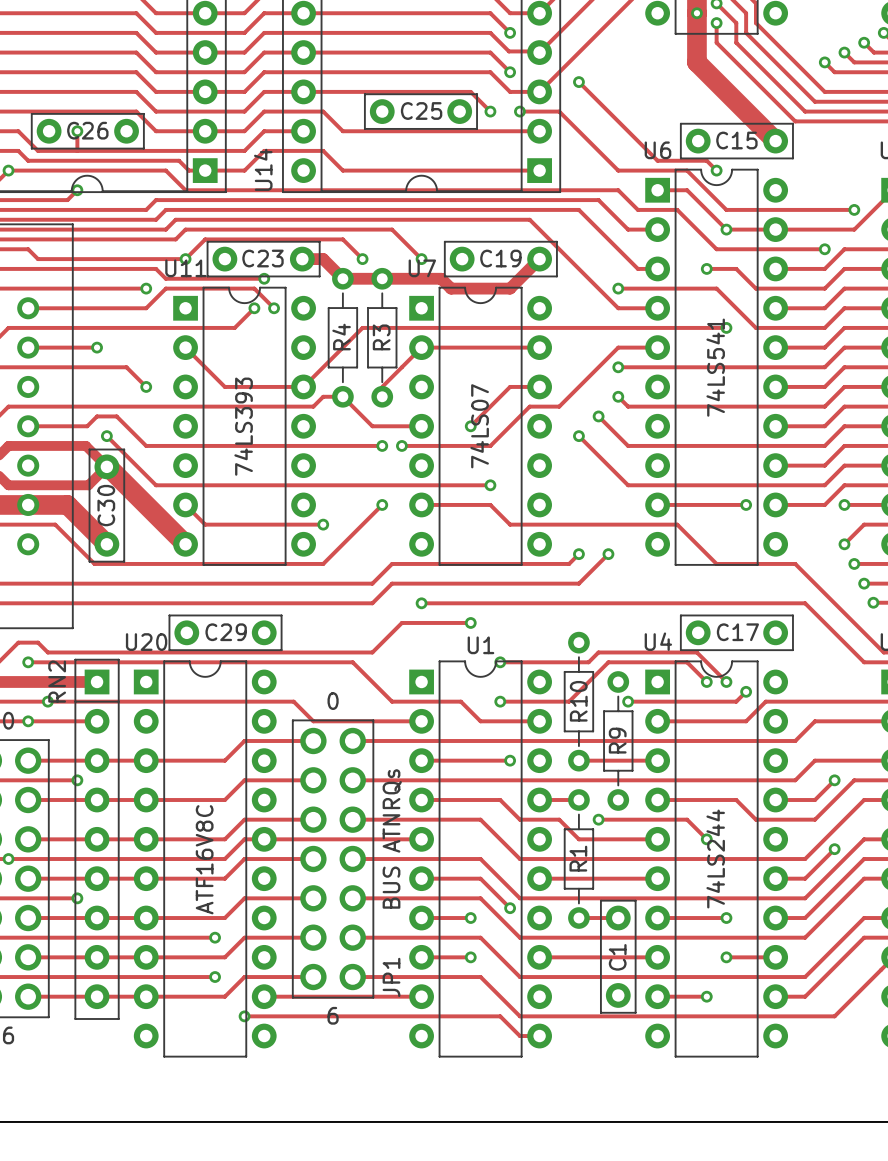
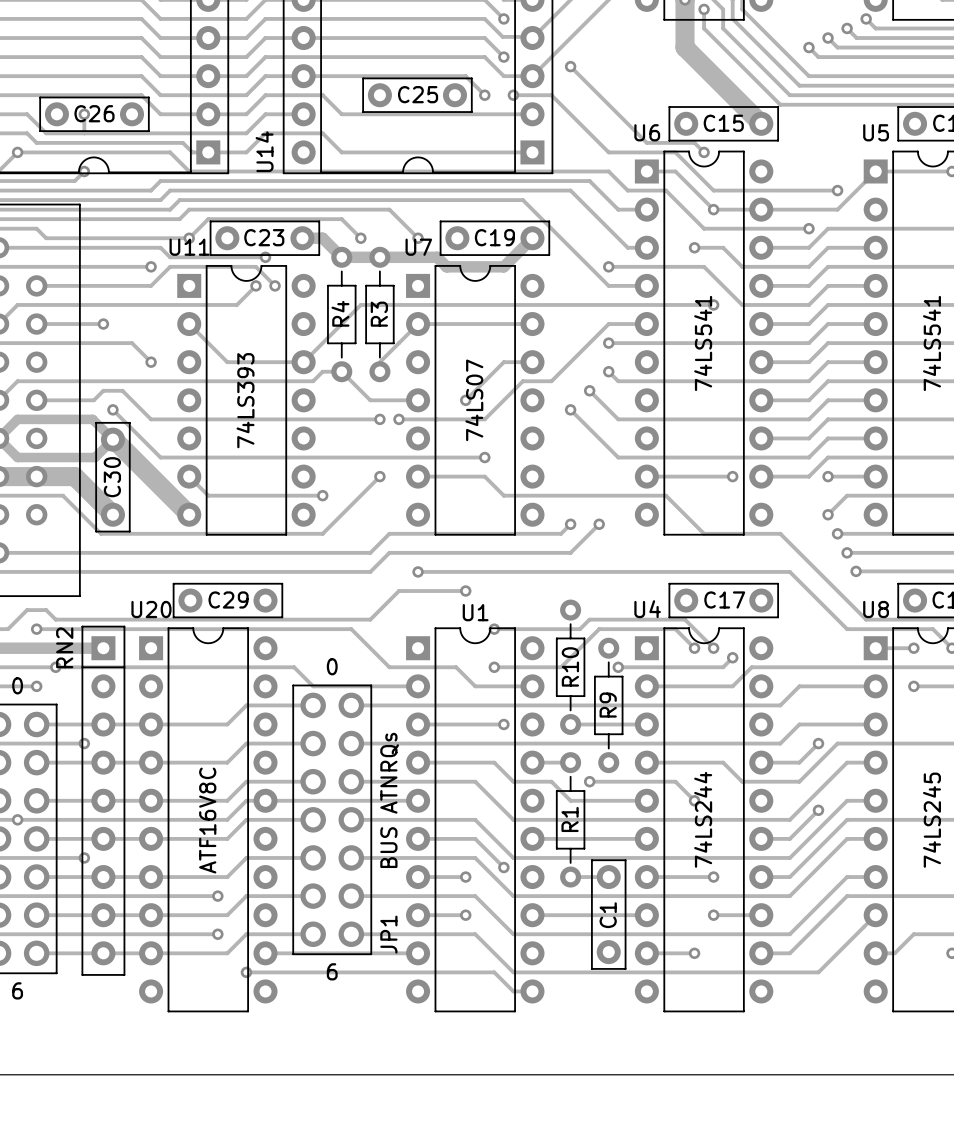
track: (28, 721) (106, 721) -> none

